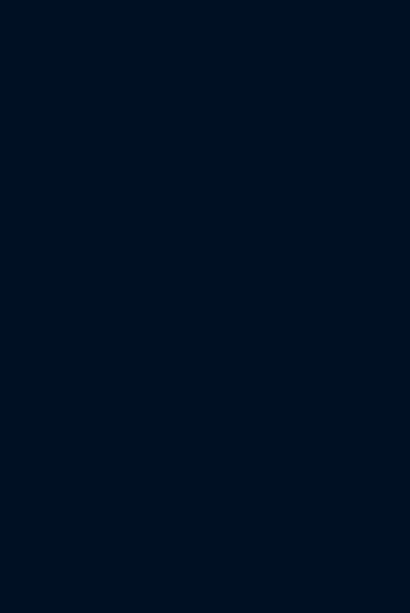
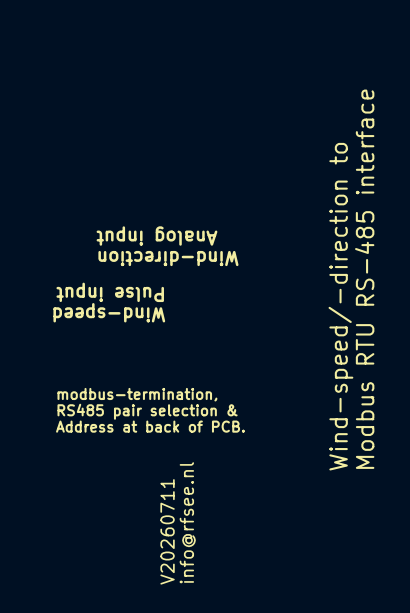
text: none -> Analog input (156, 236)
text: none -> Wind-direction (168, 258)
text: none -> Modbus RTU RS-485 interface (364, 279)
text: none -> Pulse input (110, 292)
text: none -> Wind-speed/-direction to (340, 306)
text: none -> Wind-speed (109, 312)
text: none -> modbus-termination, (137, 394)
text: none -> RS485 pair selection & (147, 411)
text: none -> Address at back of PCB. (150, 426)
text: none -> info@rfsee.nl (187, 522)
text: none -> V20260711 (167, 531)

